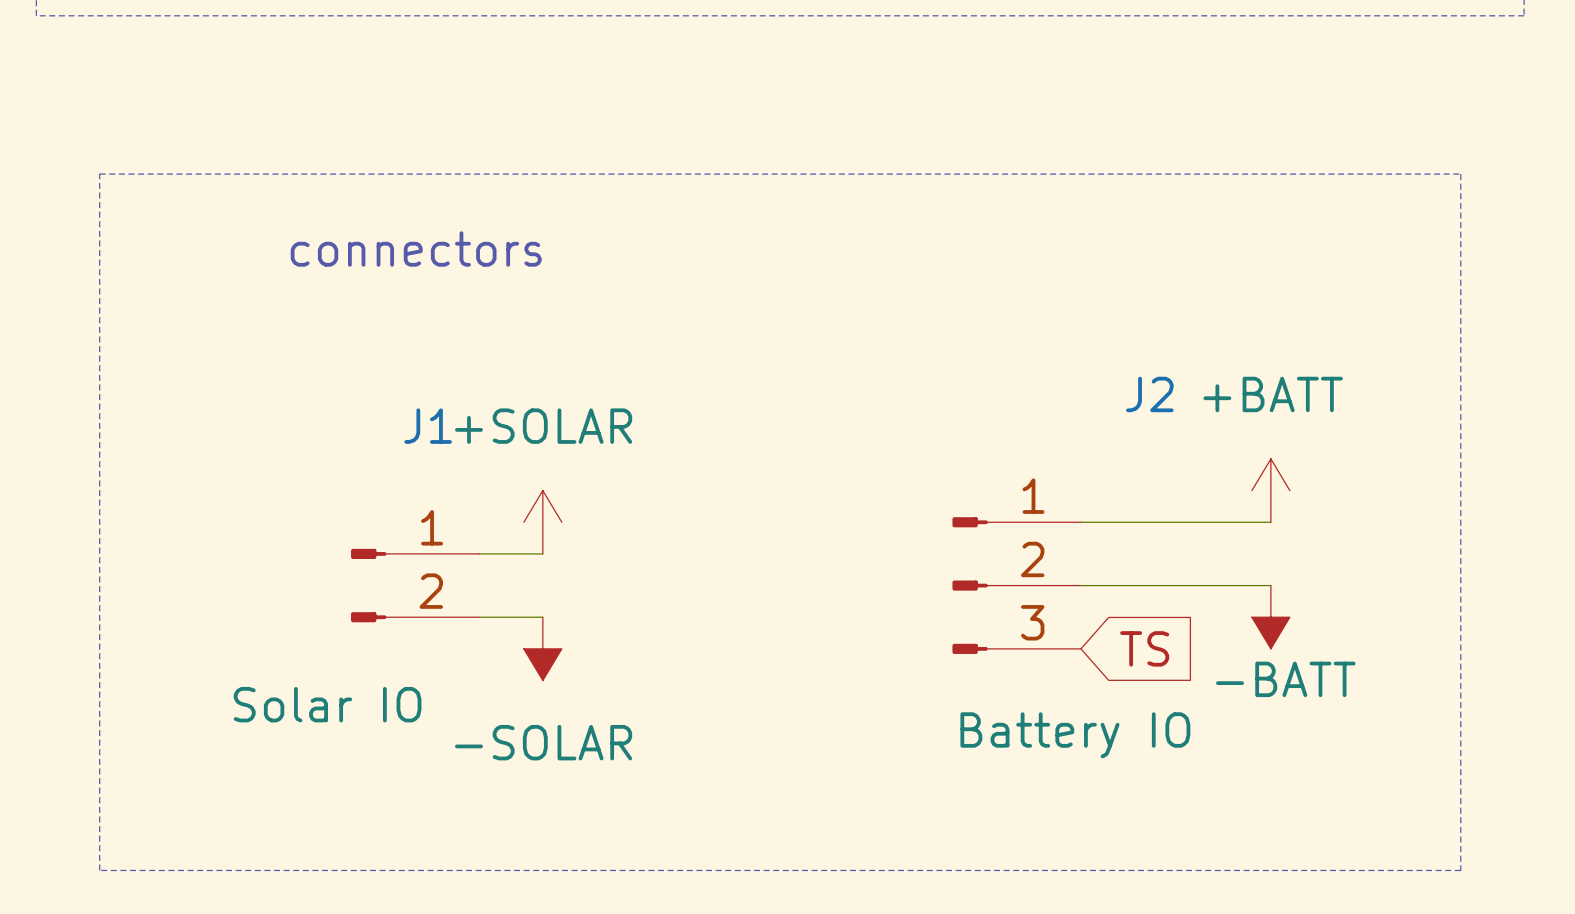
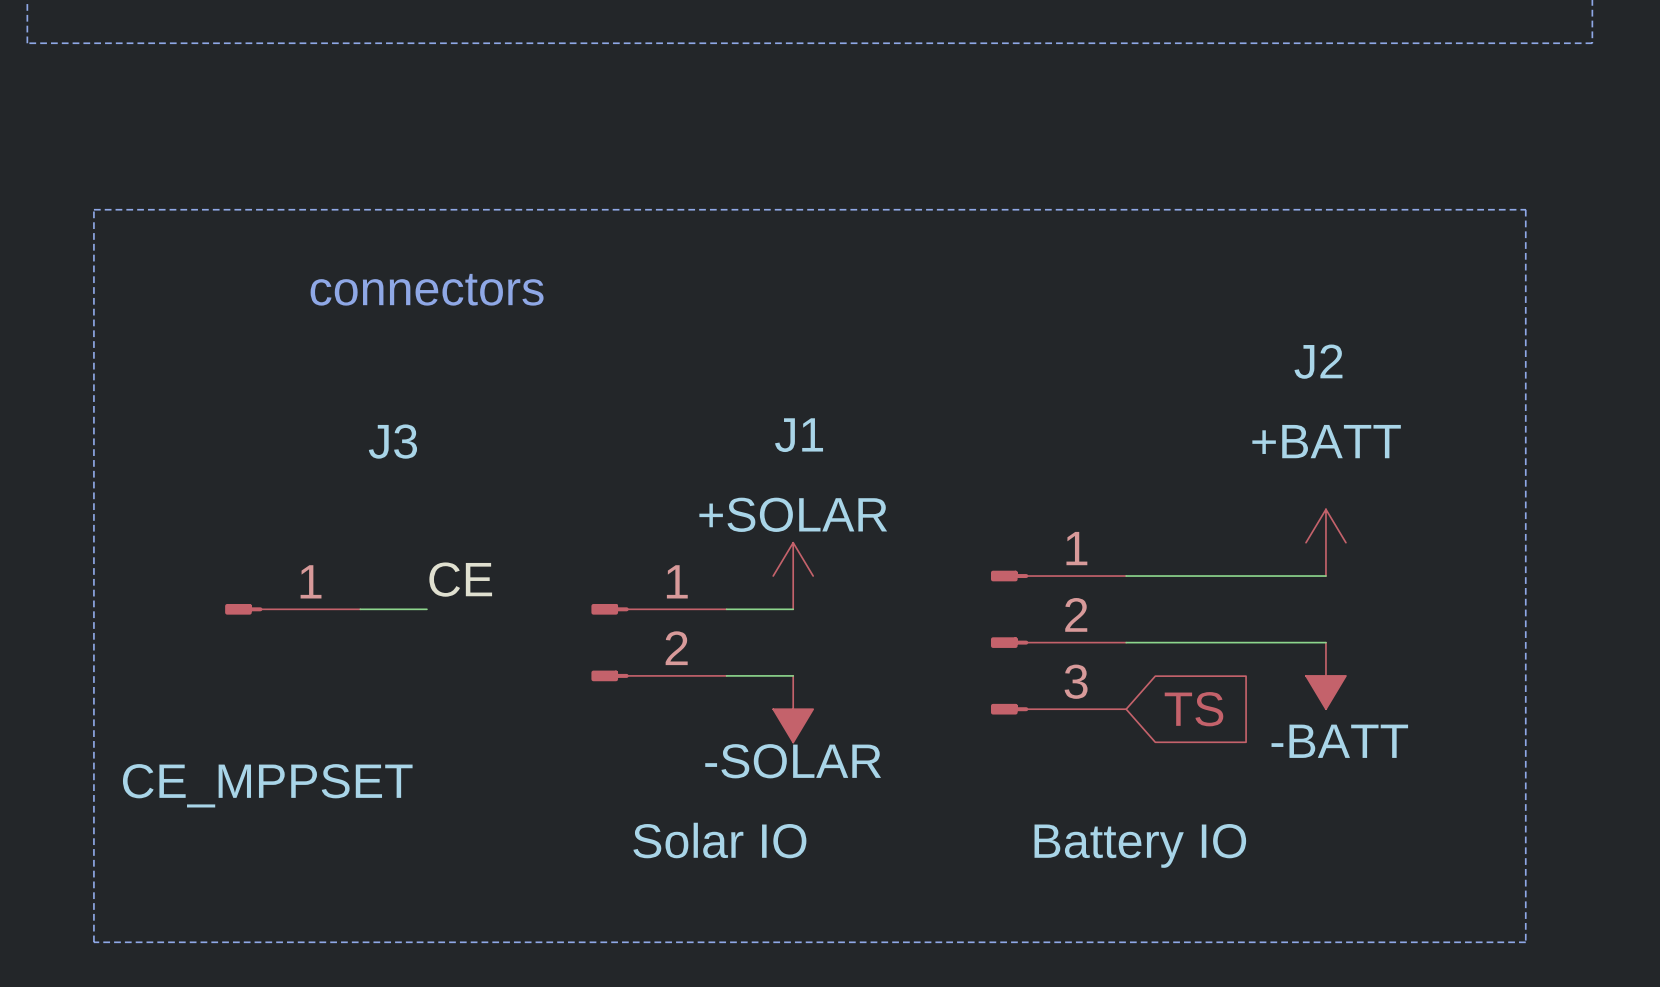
J2 name position: J2 (1149, 394) -> J2 (1318, 361)
J1 name position: J1 (428, 426) -> J1 (799, 435)
power symbol text position: +SOLAR (543, 426) -> +SOLAR (793, 514)
power symbol position: +SOLAR (542, 522) -> +SOLAR (793, 576)
label: none -> CE (460, 579)
J3: none -> CE_MPPSET (292, 609)
wire: (479, 553) (542, 553) -> (726, 609) (793, 609)
J1 position: (415, 585) -> (659, 642)
wire: (479, 617) (542, 617) -> (726, 675) (793, 675)
power symbol position: -SOLAR (542, 648) -> -SOLAR (793, 709)
J1 value position: Solar IO (327, 704) -> Solar IO (719, 840)
J2 value position: Battery IO (1075, 735) -> Battery IO (1140, 845)
power symbol text position: -SOLAR (543, 742) -> -SOLAR (793, 761)

